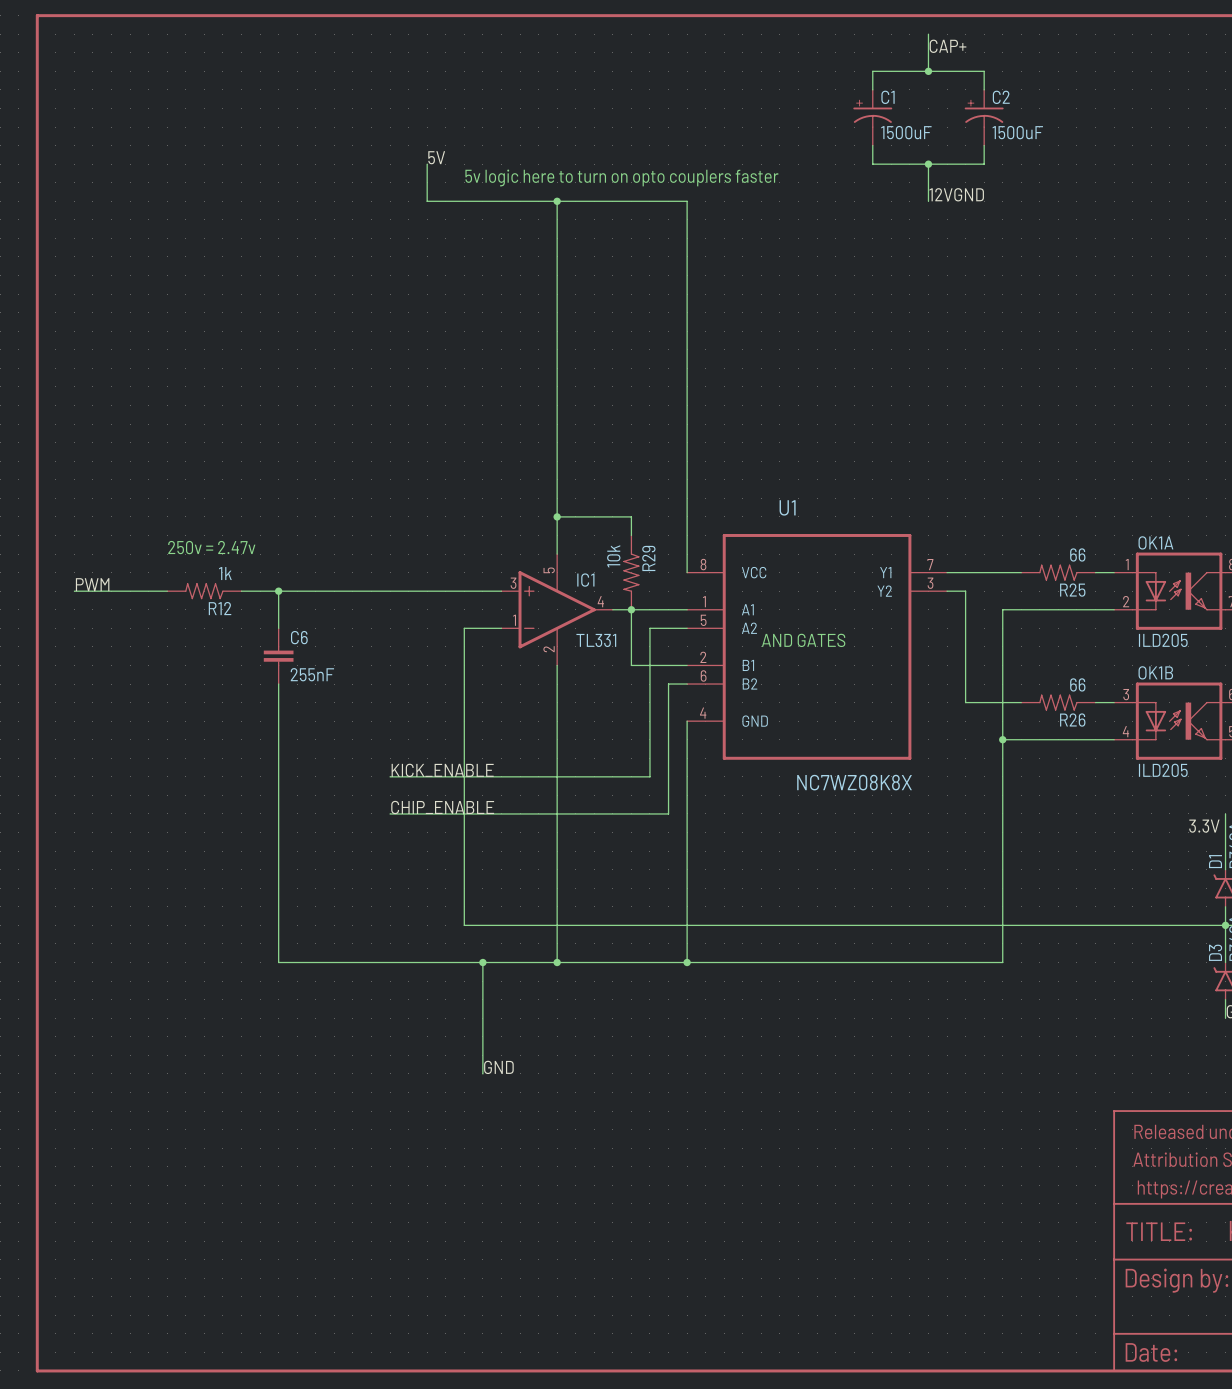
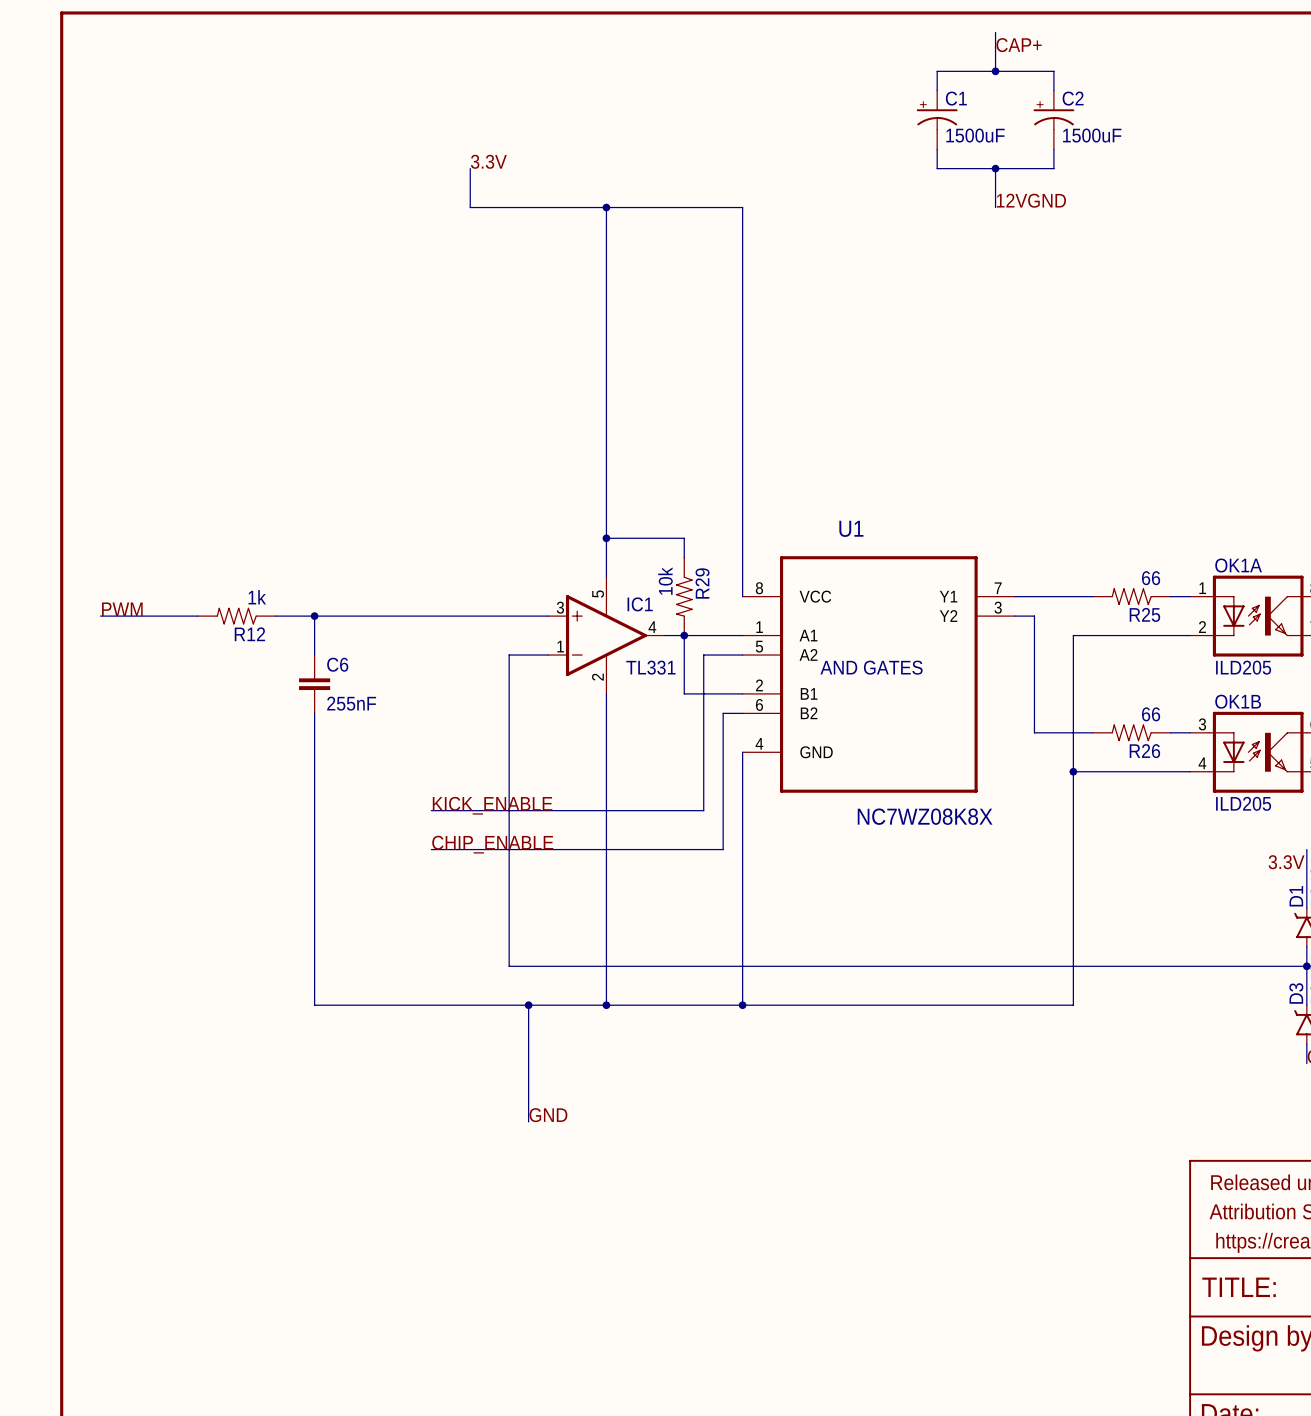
label: 5V (436, 157) -> 3.3V (488, 161)
text: 5v logic here to turn on opto couplers faster (621, 177) -> none
text: 250v = 2.47v (211, 547) -> none

